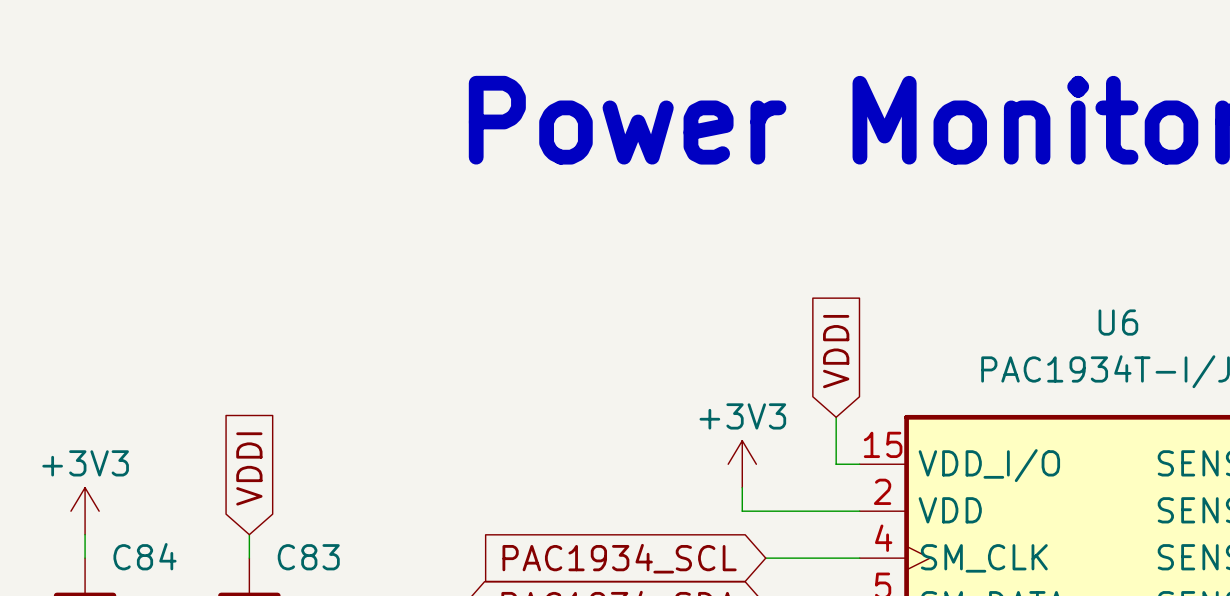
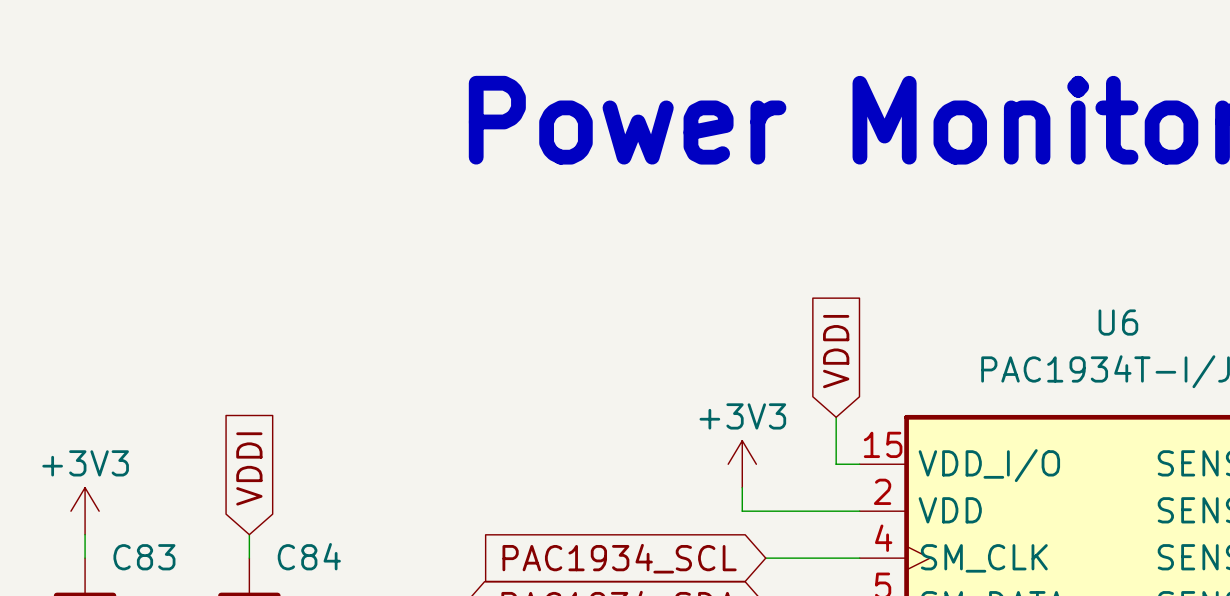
C84 name: C84 (145, 556) -> C83 (144, 557)
C83 name: C83 (308, 557) -> C84 (309, 556)

